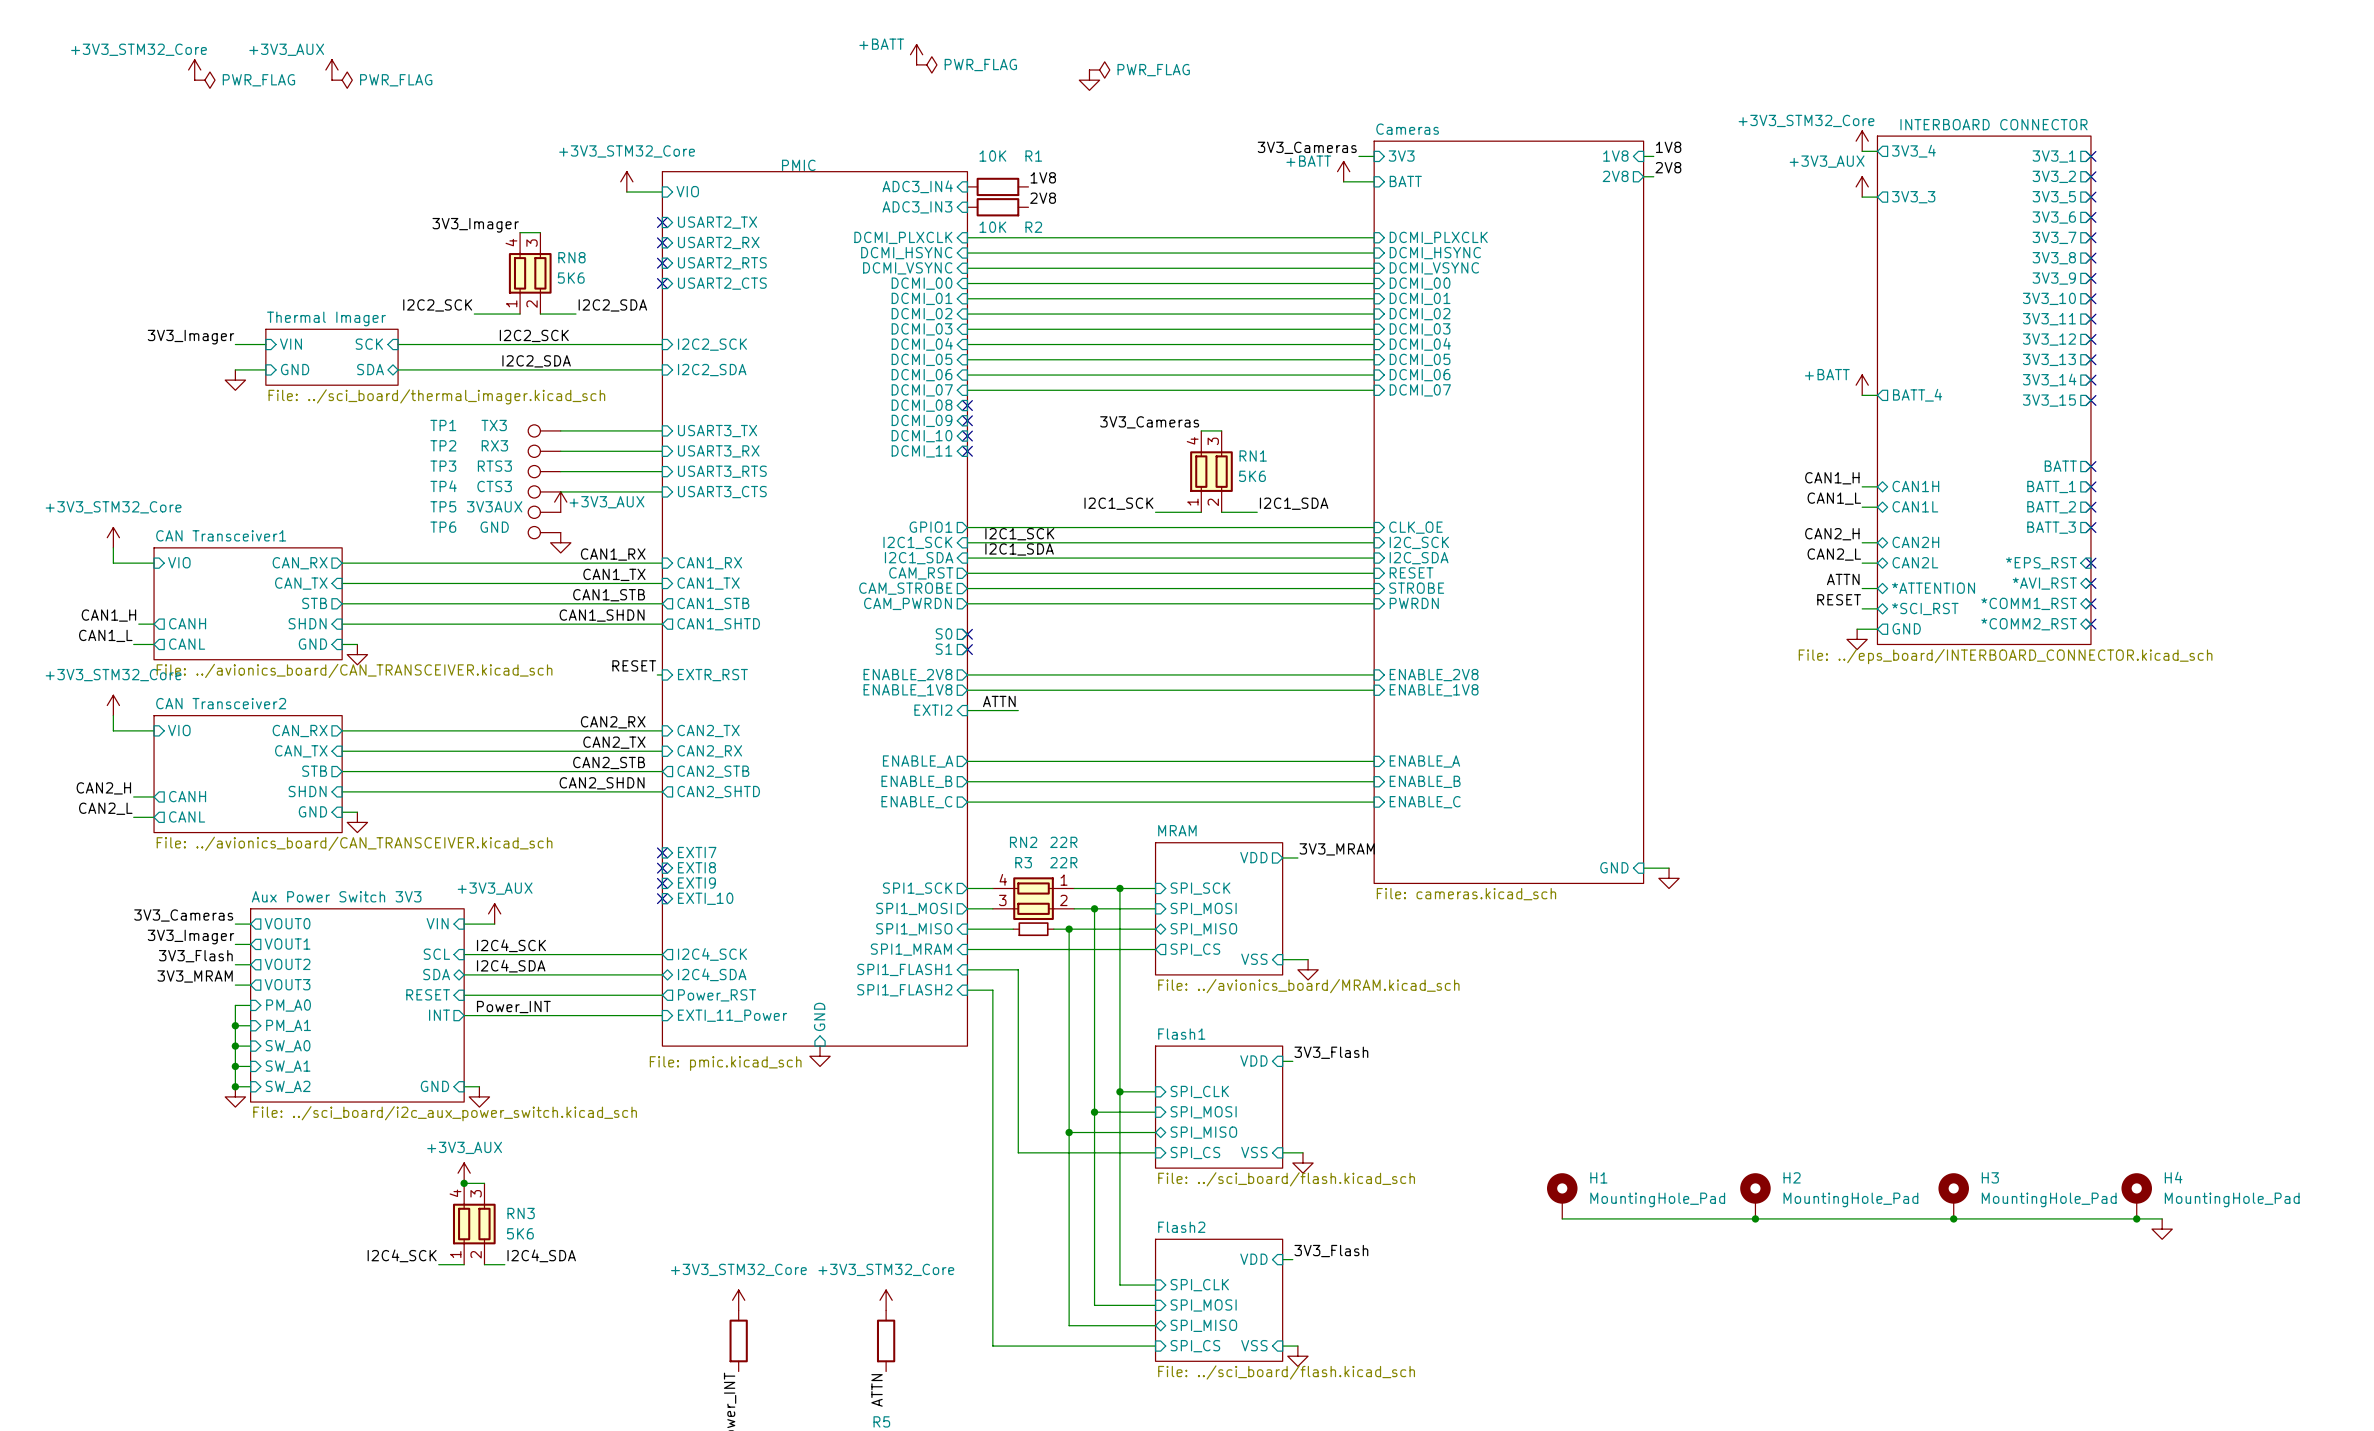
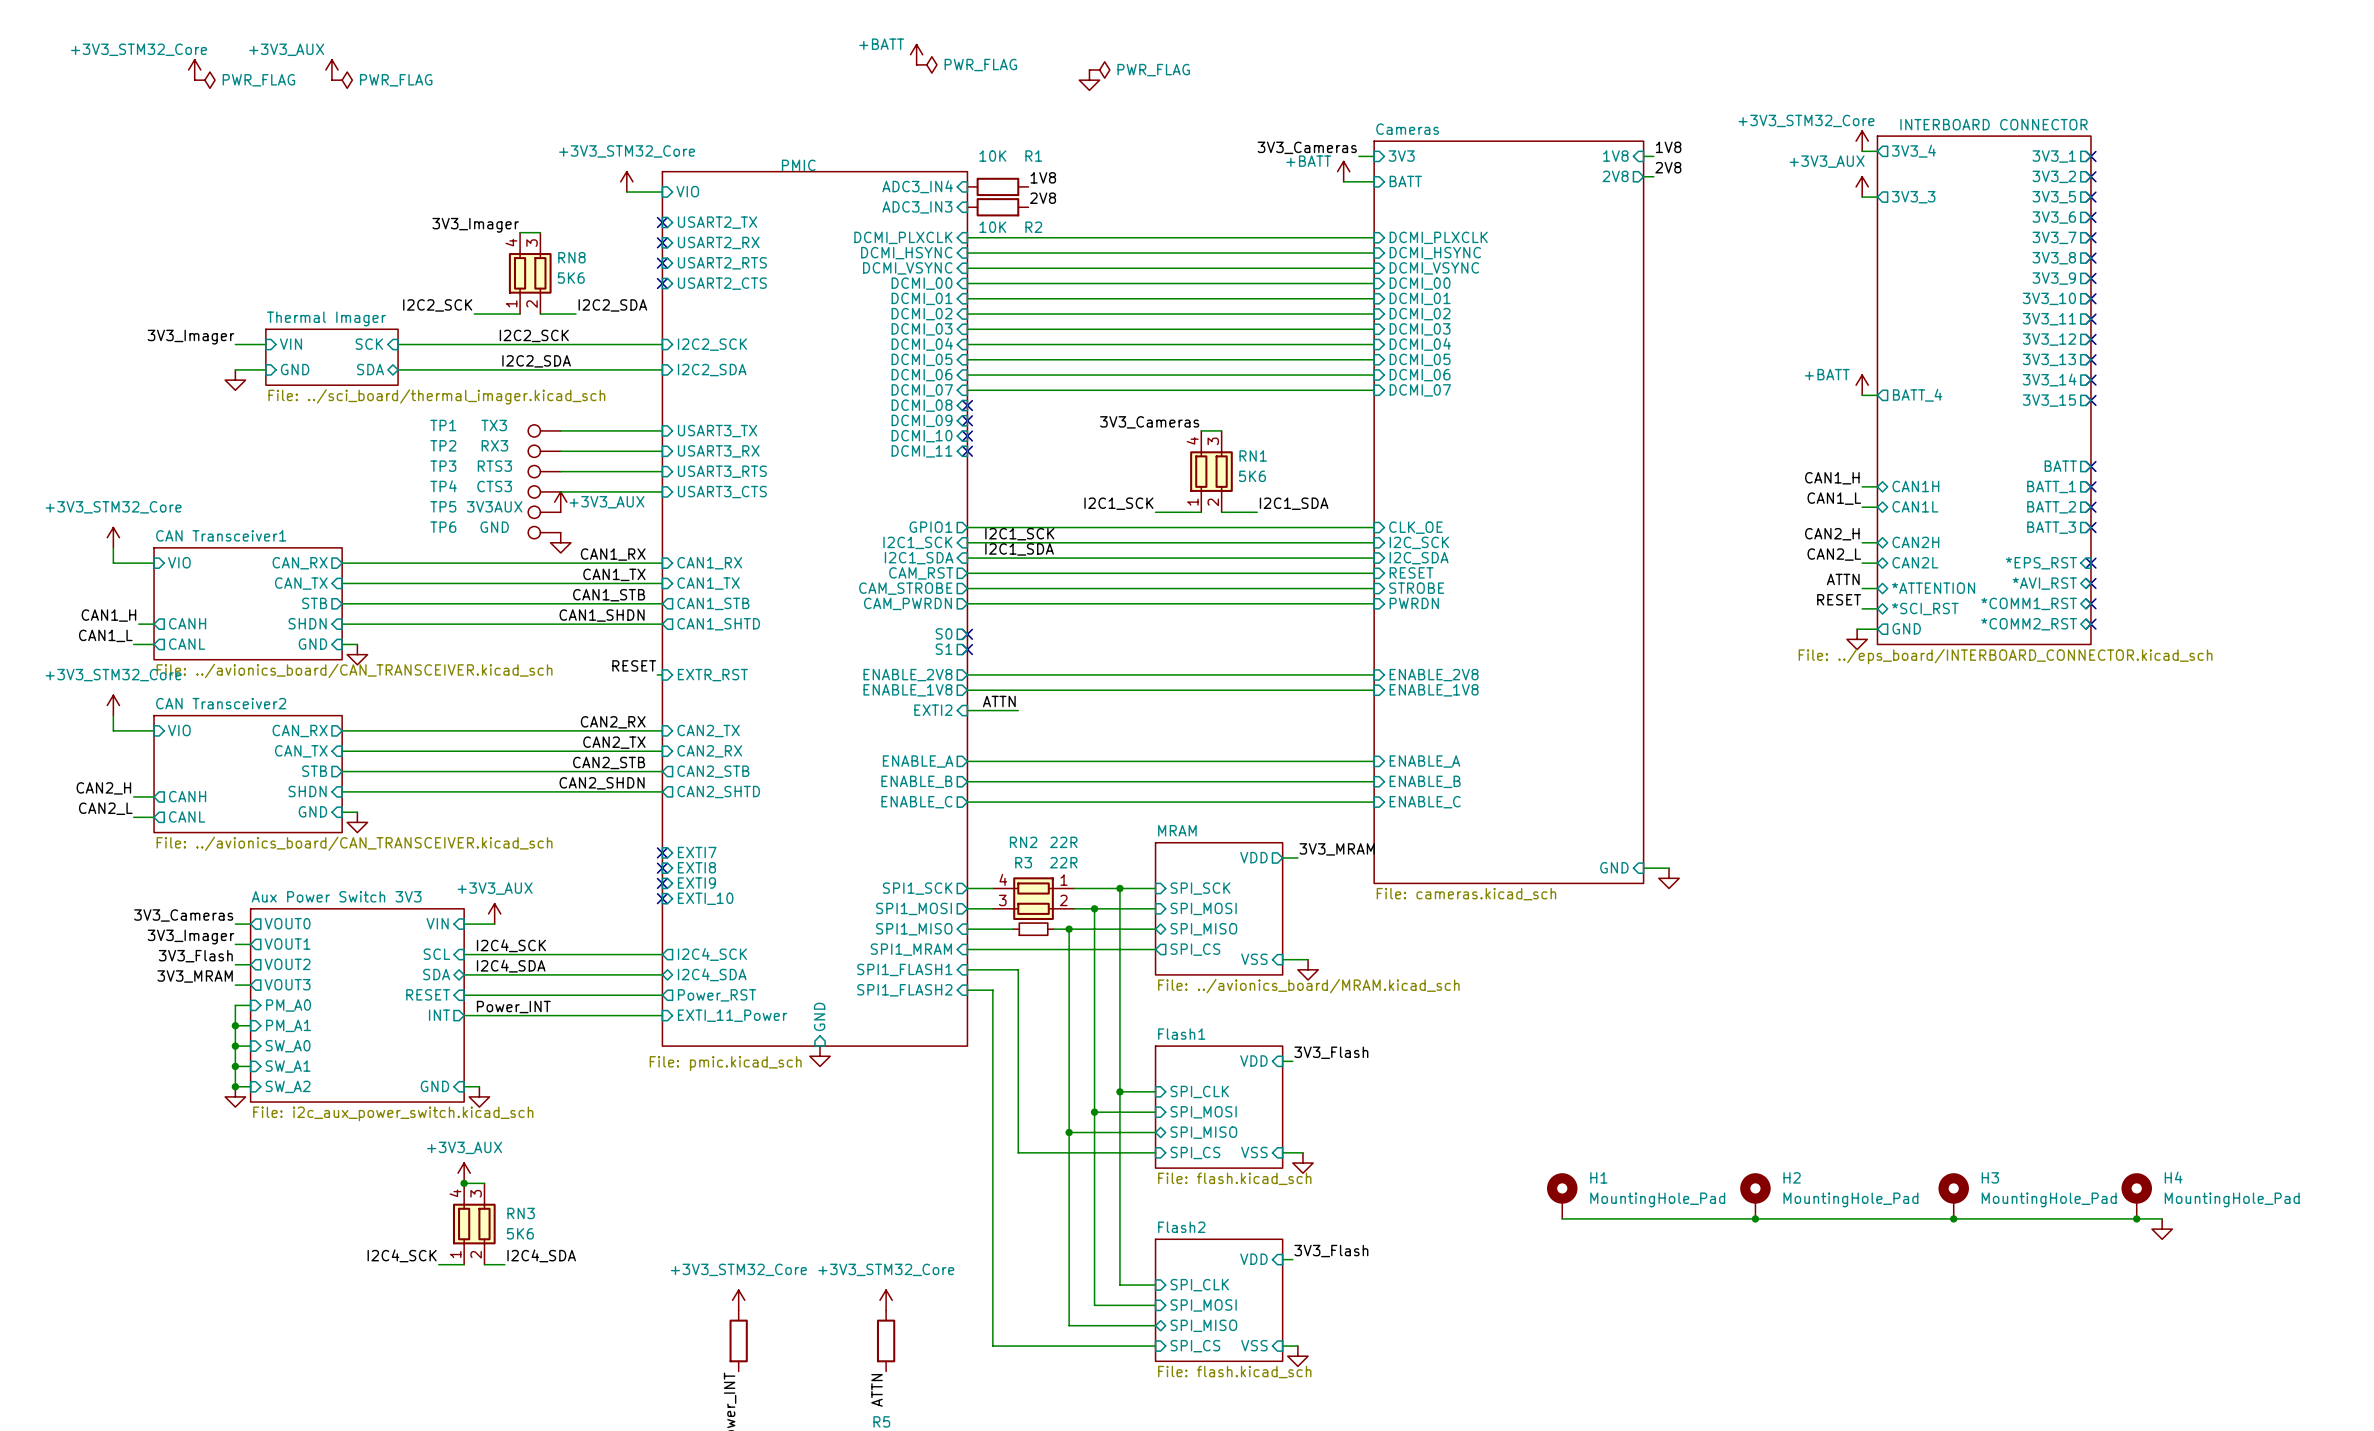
sheet Aux Power Switch 3V3 value: File: ../sci_board/i2c_aux_power_switch.kicad_sch (445, 1113) -> File: i2c_aux_power_switch.kicad_sch (393, 1113)
sheet Flash1 value: File: ../sci_board/flash.kicad_sch (1286, 1179) -> File: flash.kicad_sch (1234, 1178)
sheet Flash2 value: File: ../sci_board/flash.kicad_sch (1286, 1372) -> File: flash.kicad_sch (1234, 1372)

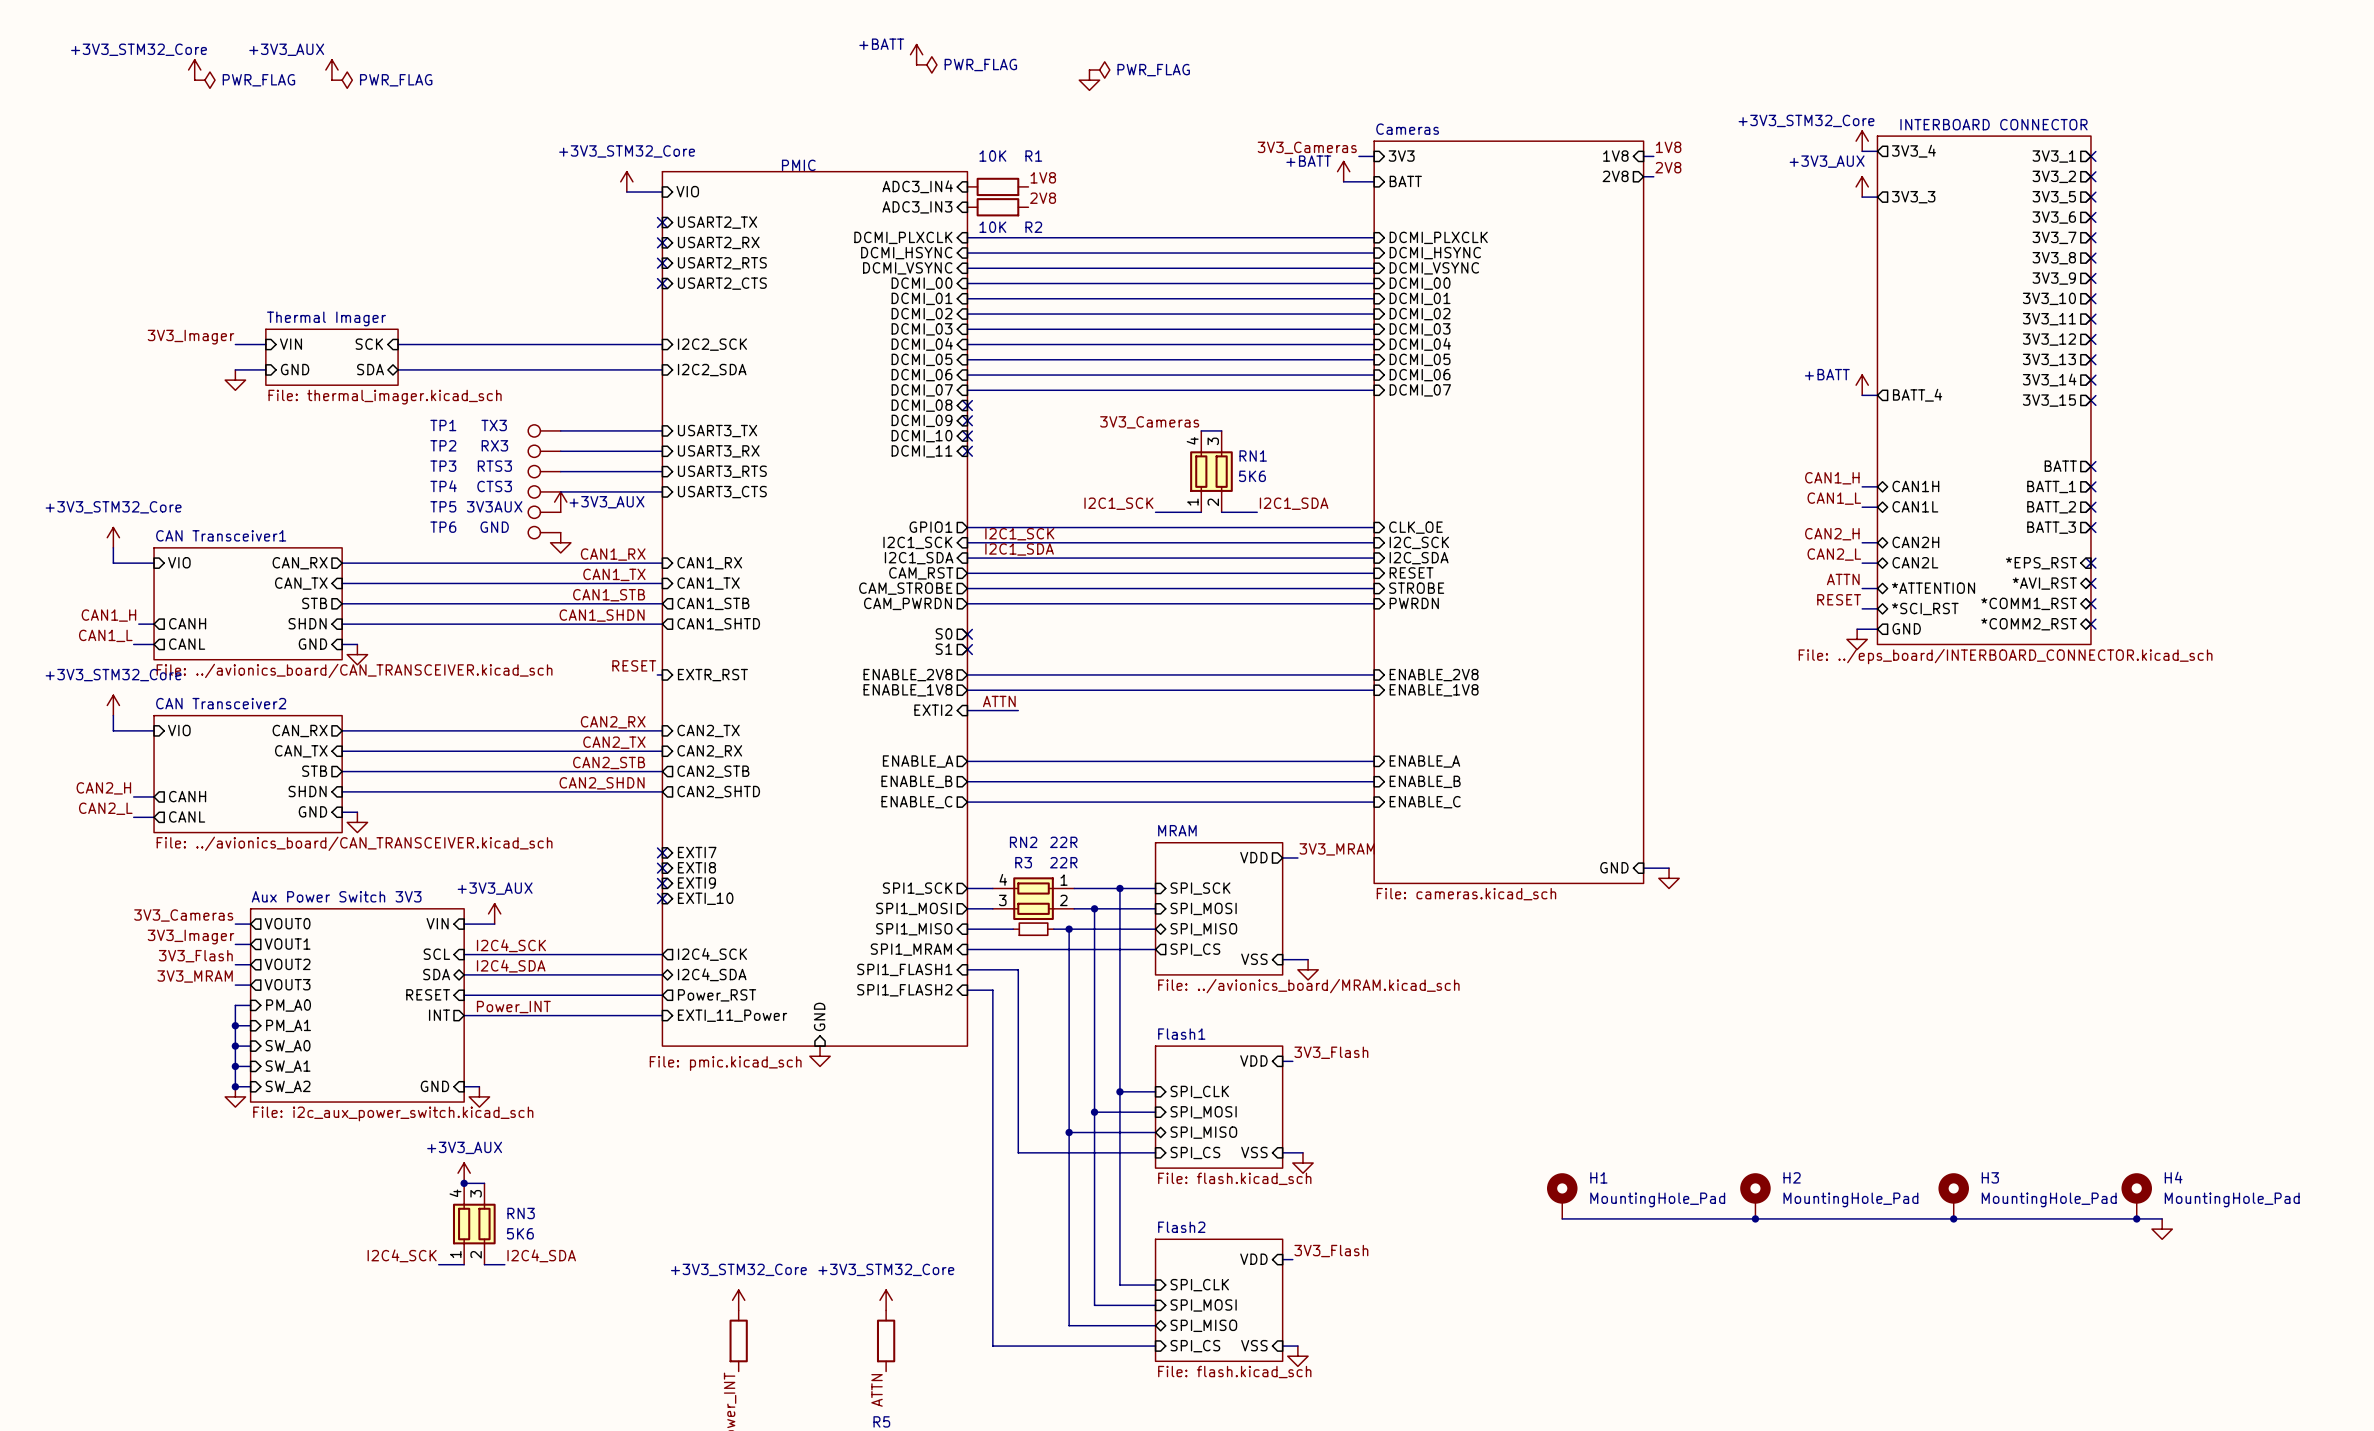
label: 3V3_Imager (475, 225) -> none
wire: (520, 232) (540, 232) -> none
RN8: 5K6 (530, 273) -> none
label: I2C2_SCK (437, 305) -> none
label: I2C2_SDA (612, 305) -> none
wire: (474, 314) (520, 314) -> none
wire: (540, 314) (575, 314) -> none
label: I2C2_SCK (534, 335) -> none
label: I2C2_SDA (536, 361) -> none
sheet Thermal Imager value: File: ../sci_board/thermal_imager.kicad_sch (436, 396) -> File: thermal_imager.kicad_sch (385, 397)

